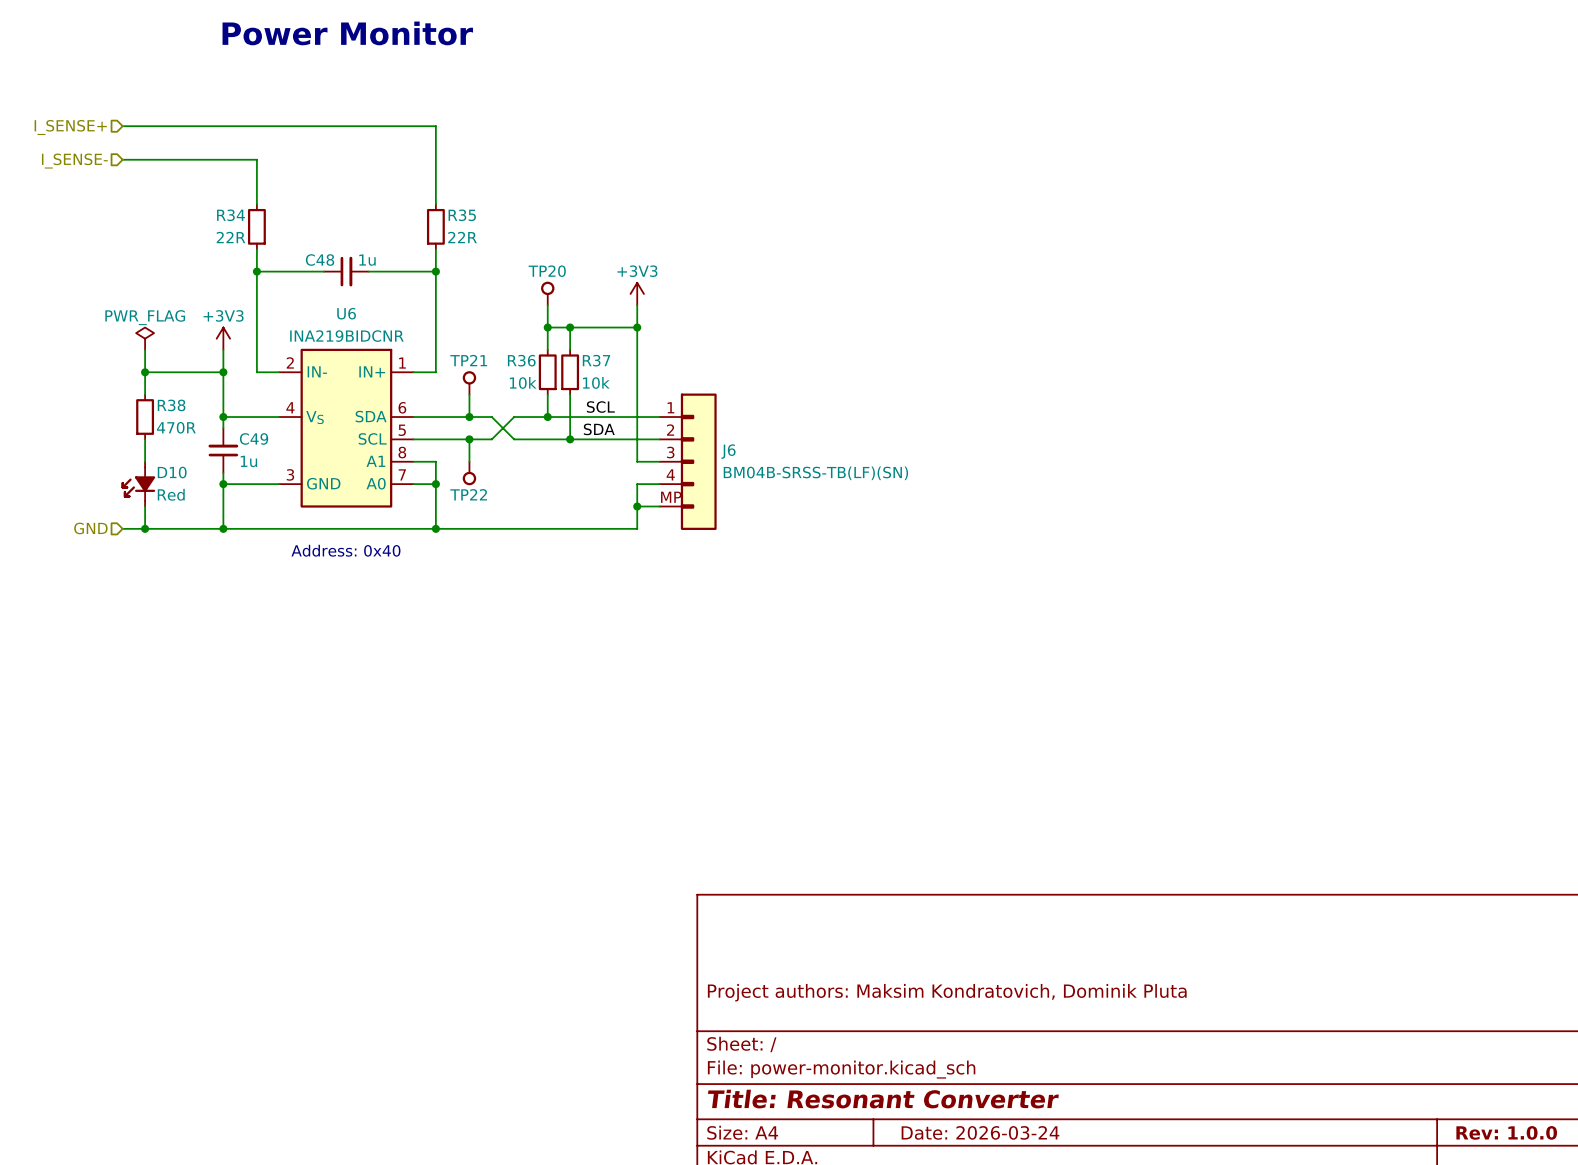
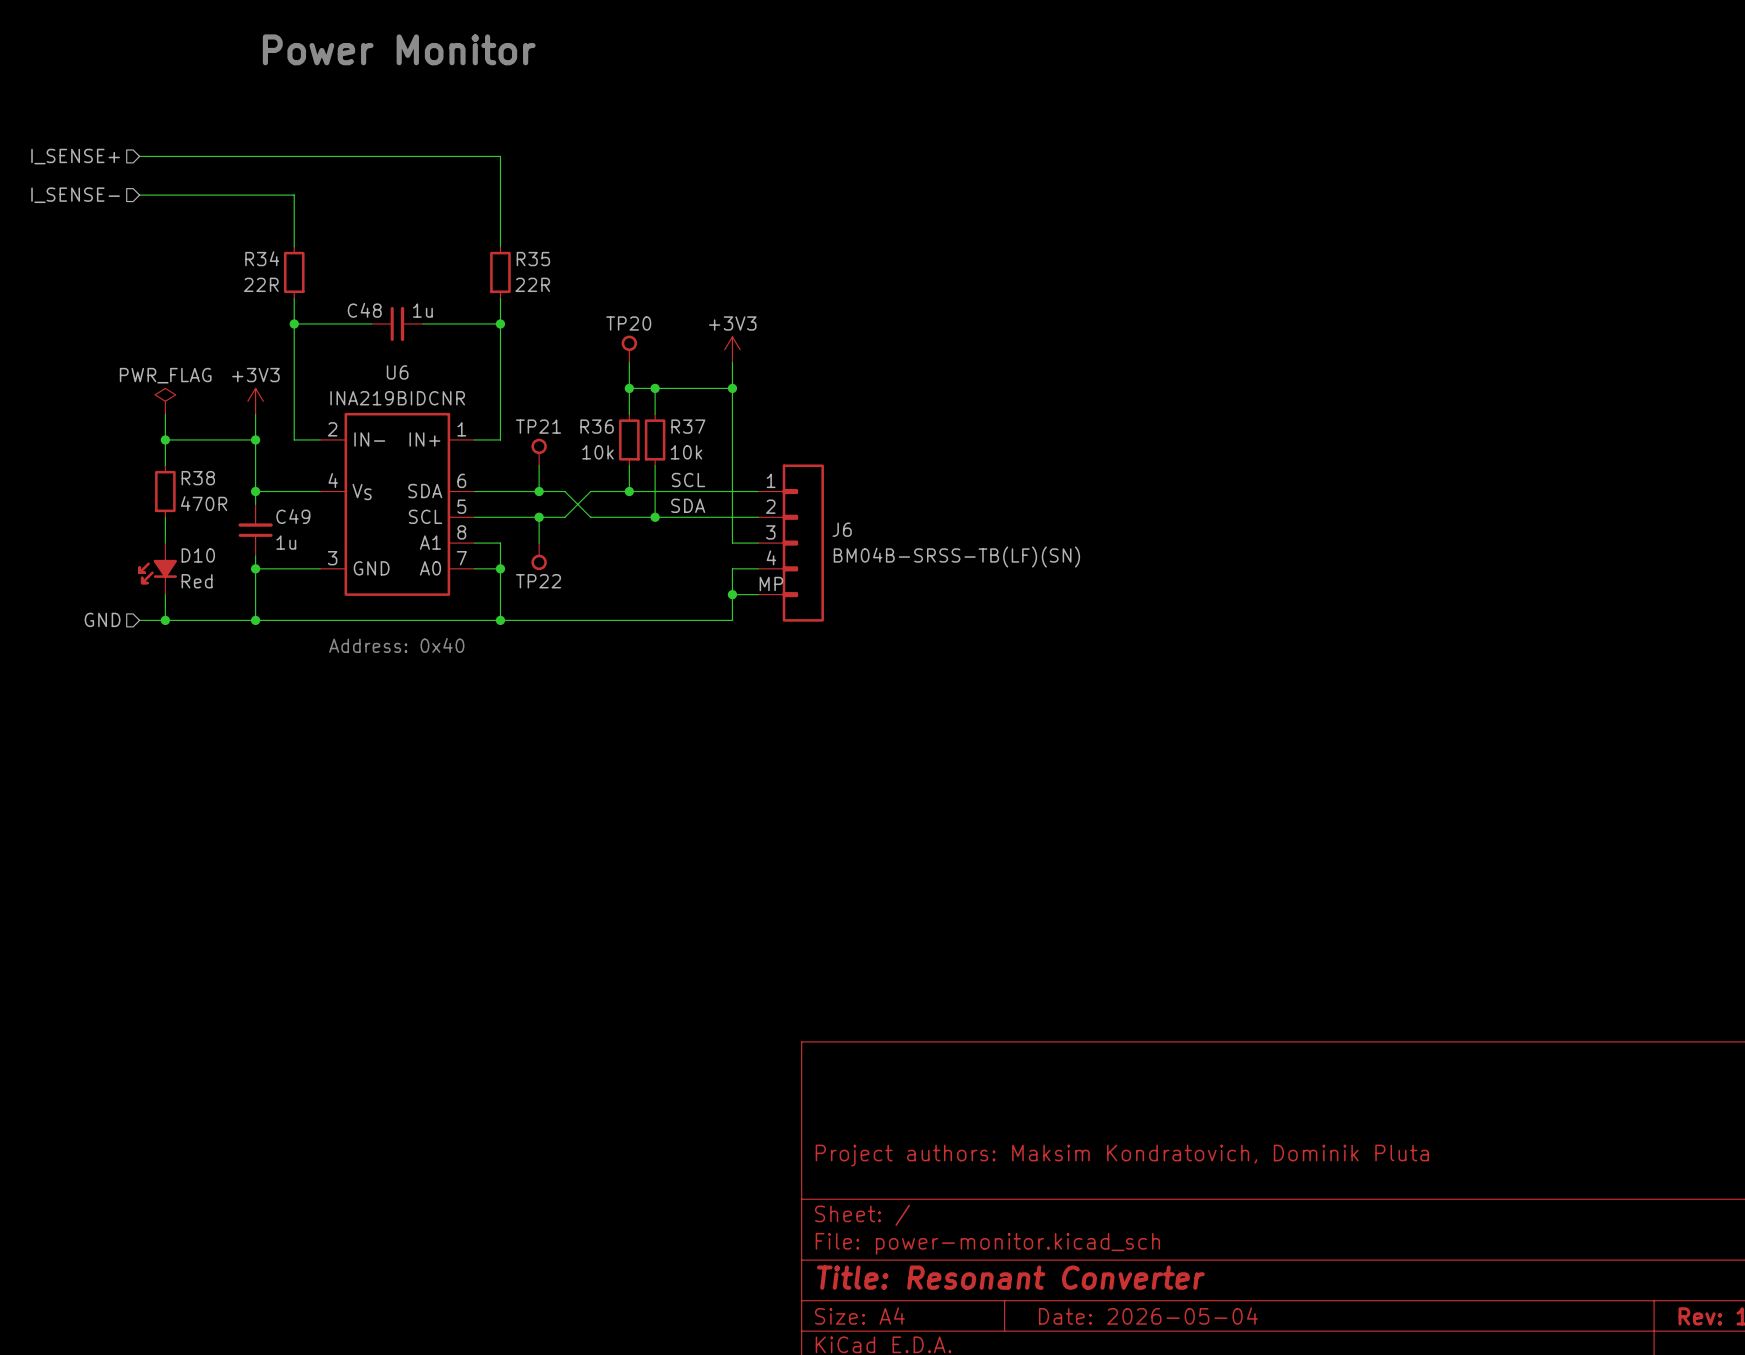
title block: Date: 2026-03-24 (980, 1132) -> Date: 2026-05-04 (1148, 1316)

